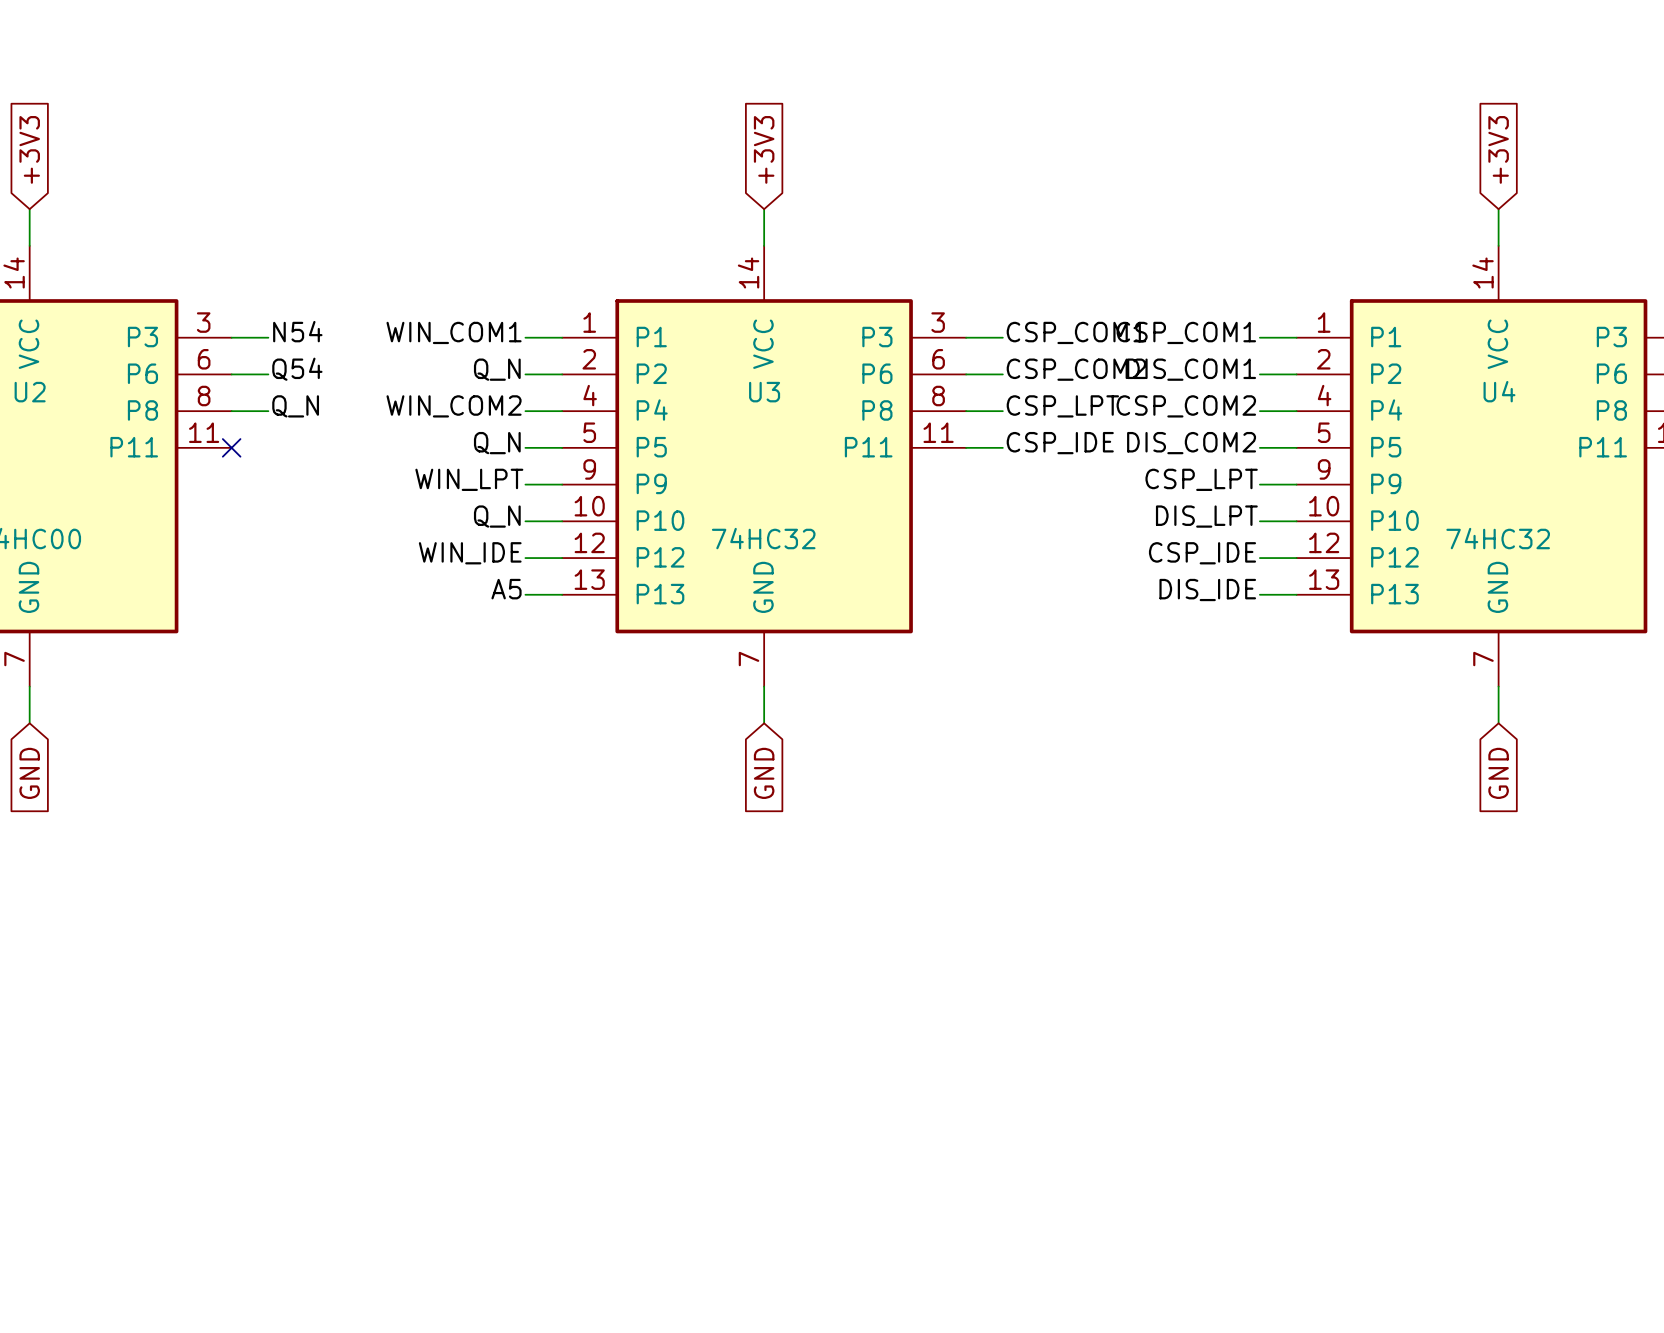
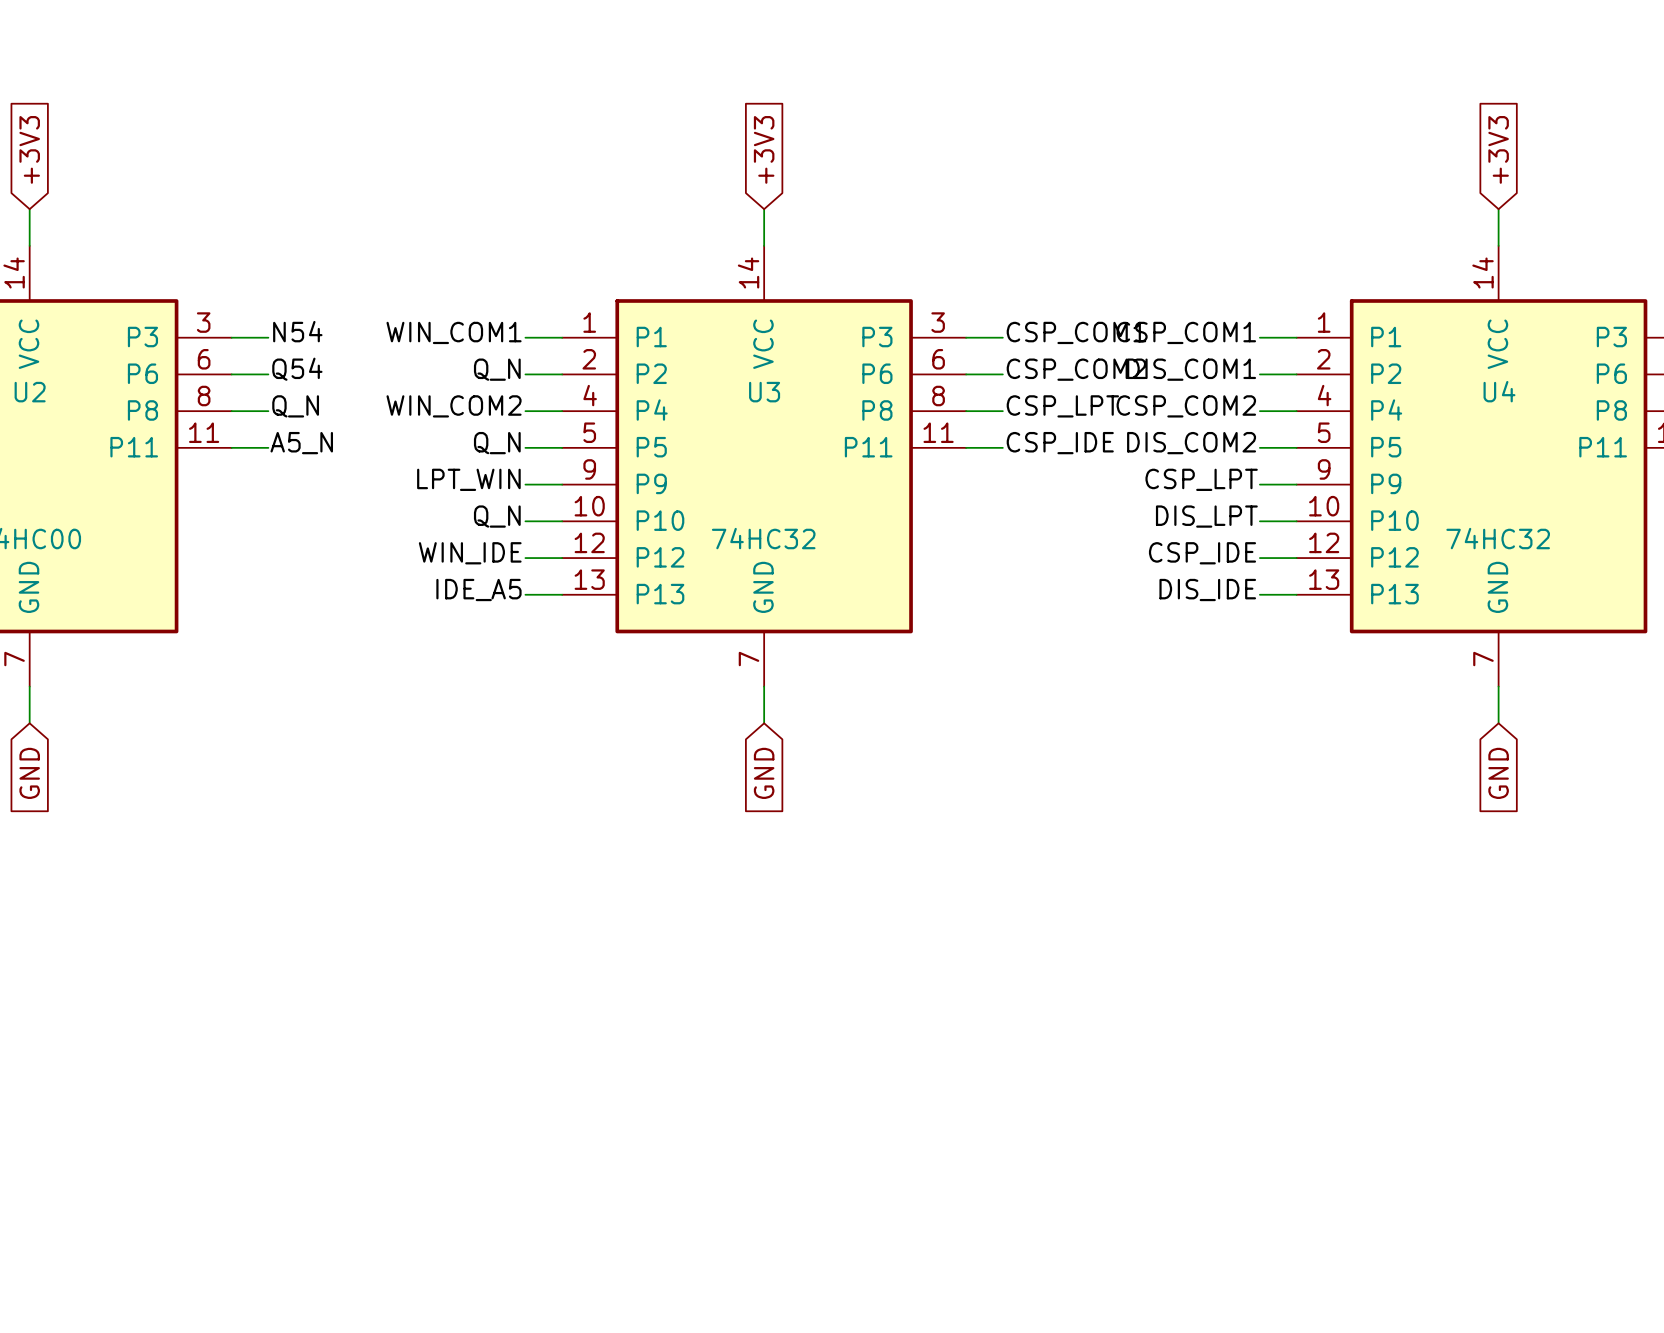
label: none -> A5_N (301, 443)
wire: none -> (231, 447) (268, 447)
no-connect mark: (231, 447) -> none
label: WIN_LPT (469, 479) -> LPT_WIN (468, 479)
label: A5 (506, 589) -> IDE_A5 (478, 589)

